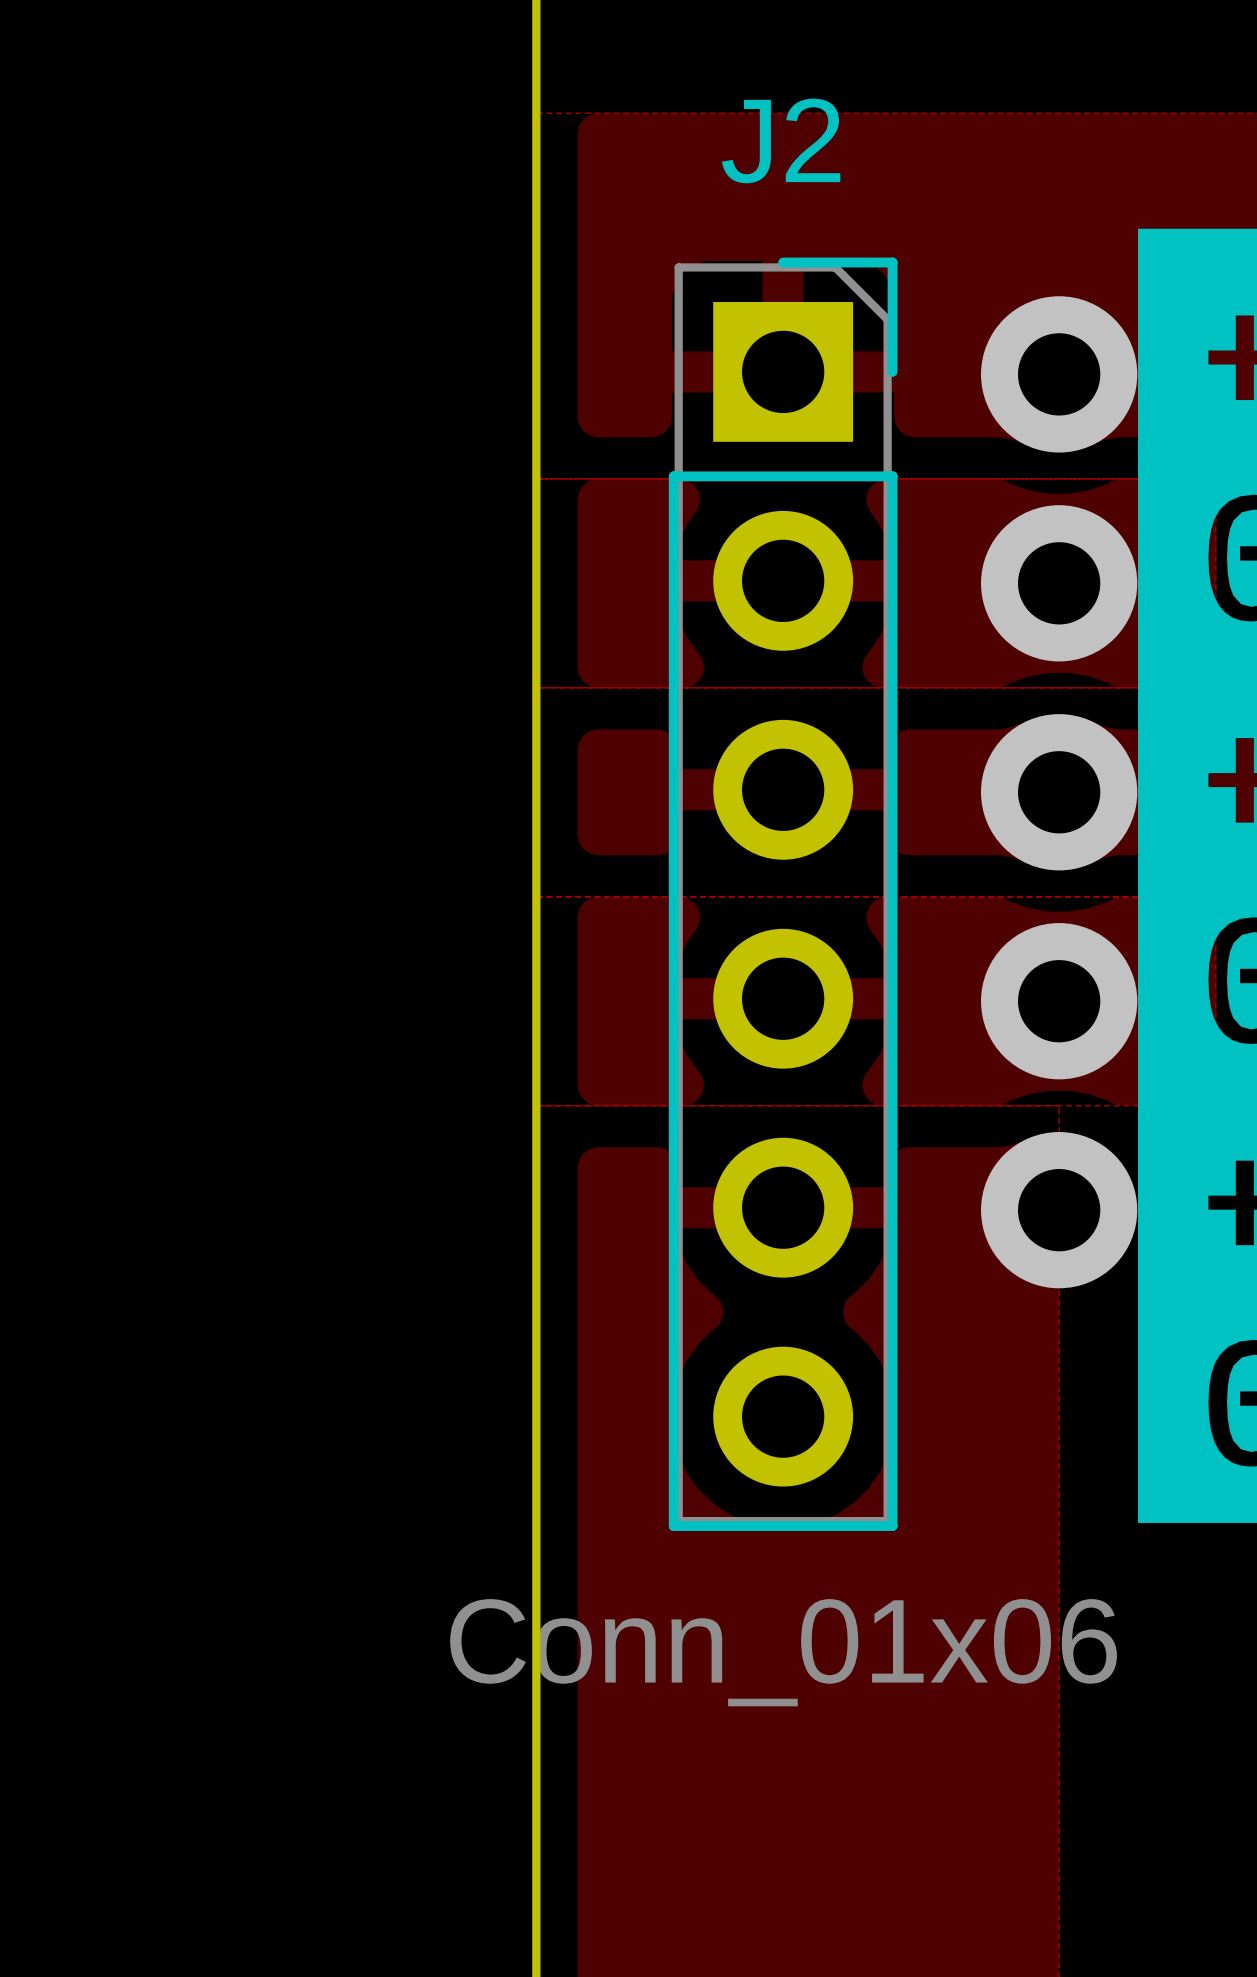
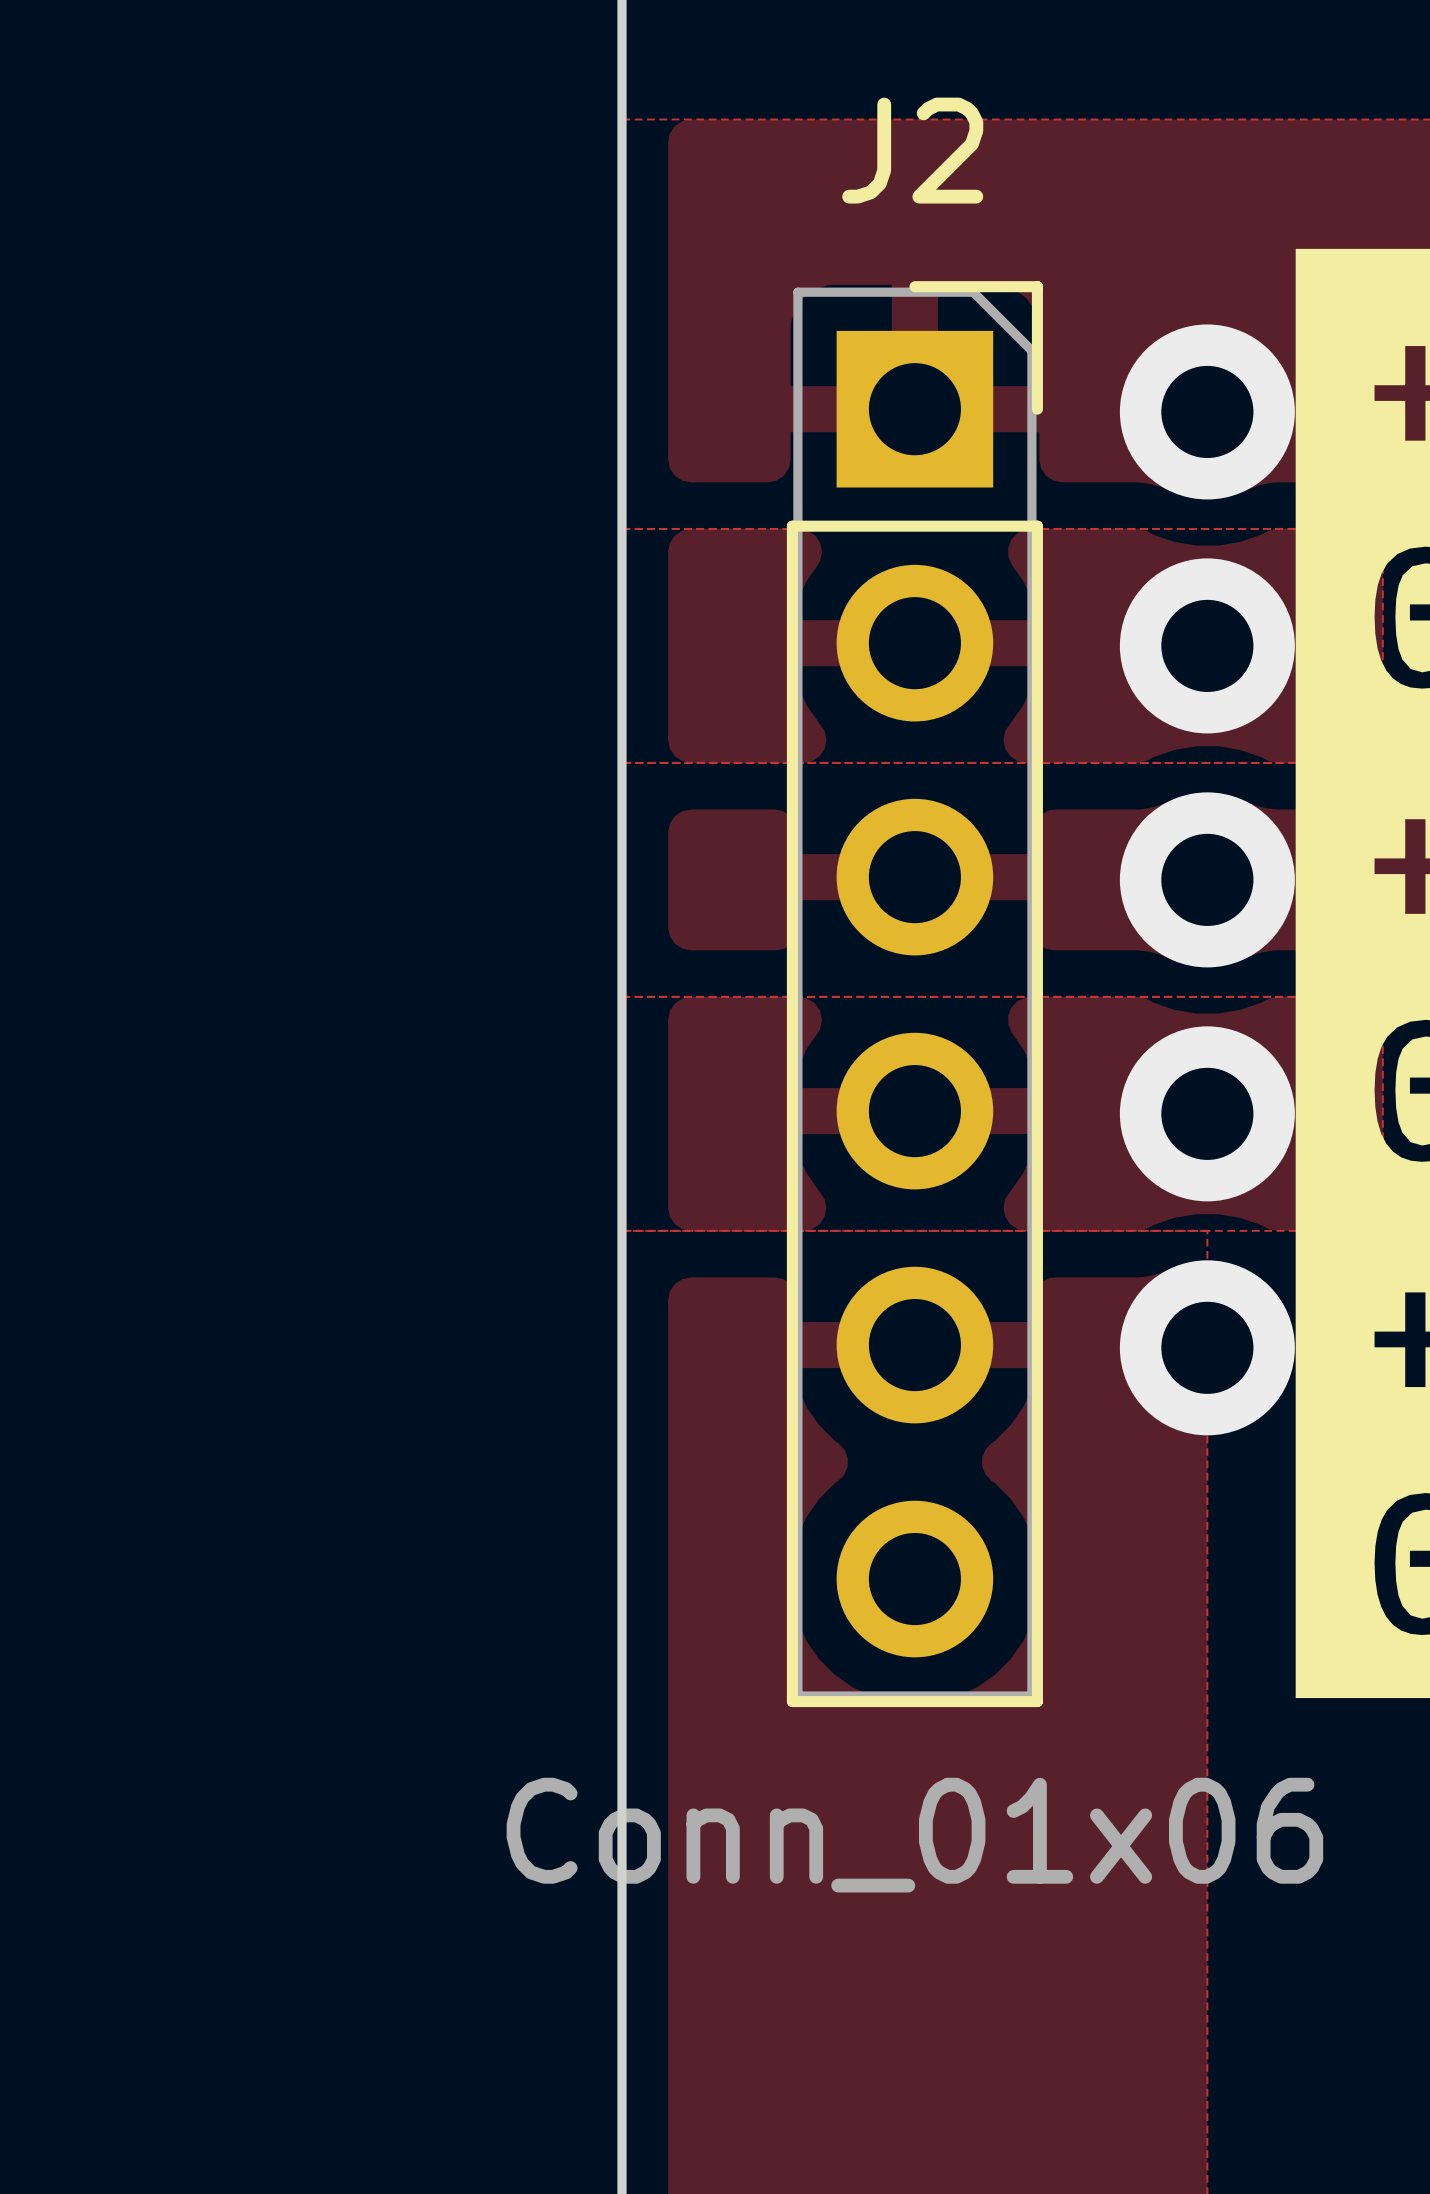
J2 position: (783, 894) -> (914, 994)

